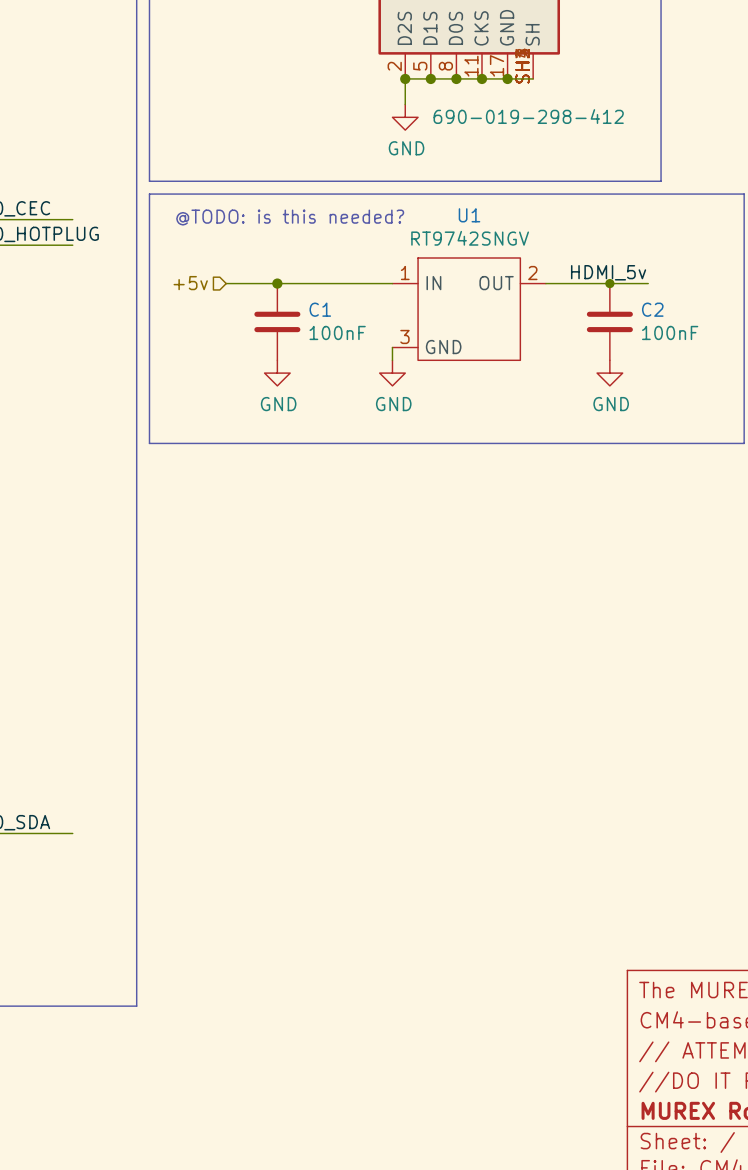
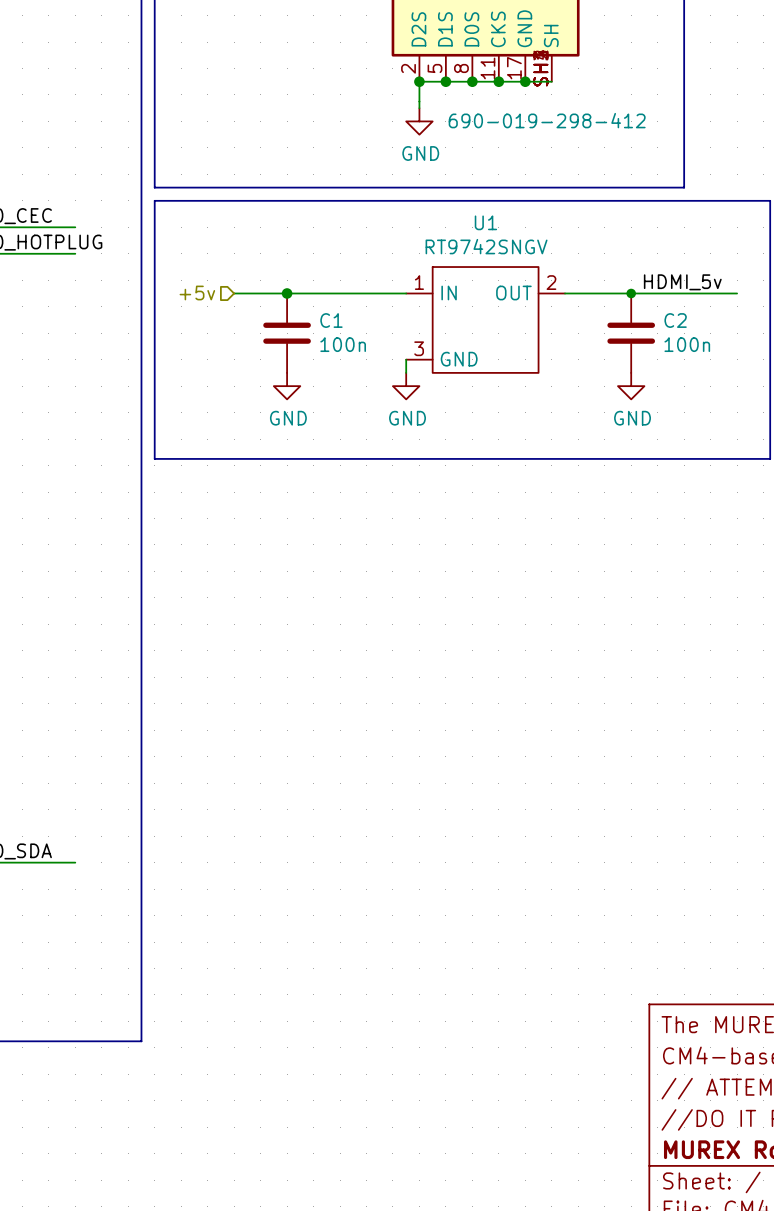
text: @TODO: is this needed? (290, 217) -> none
label position: HDMI_5v (608, 272) -> HDMI_5v (682, 282)
wire: none -> (670, 293) (737, 293)
C1 value: 100nF (337, 332) -> 100n (343, 344)
C2 value: 100nF (670, 332) -> 100n (687, 344)

